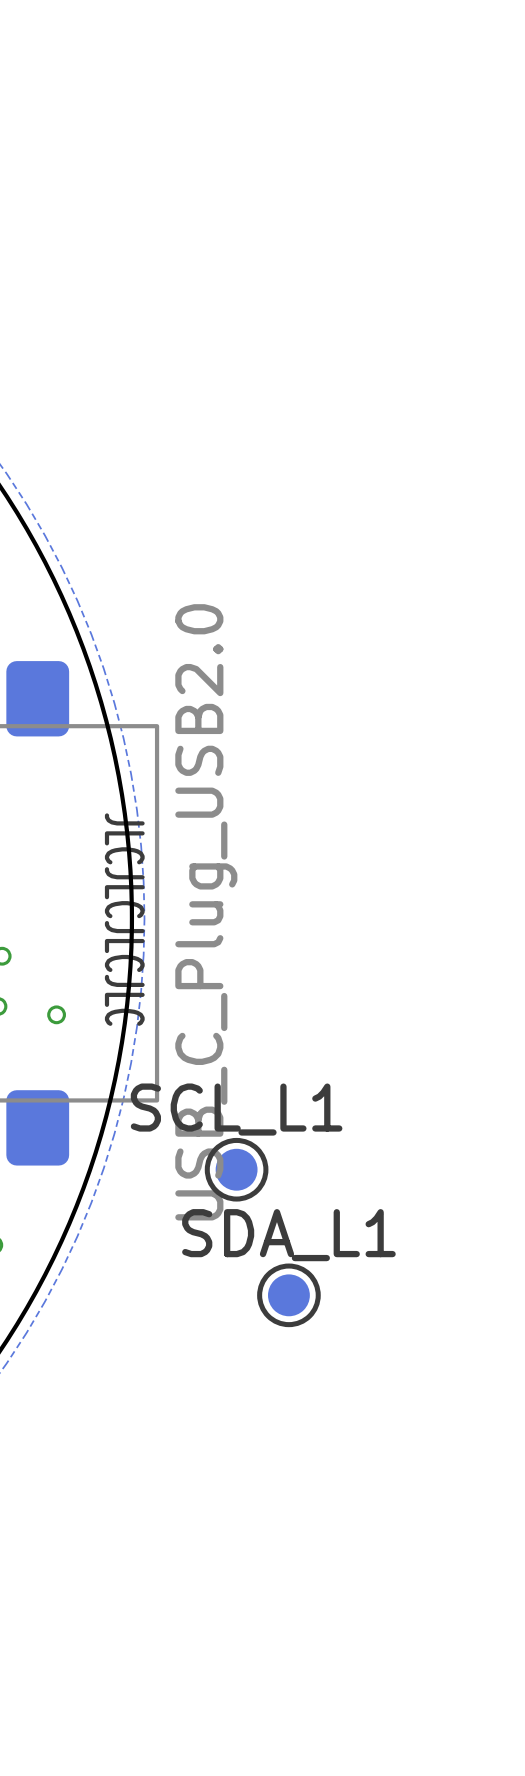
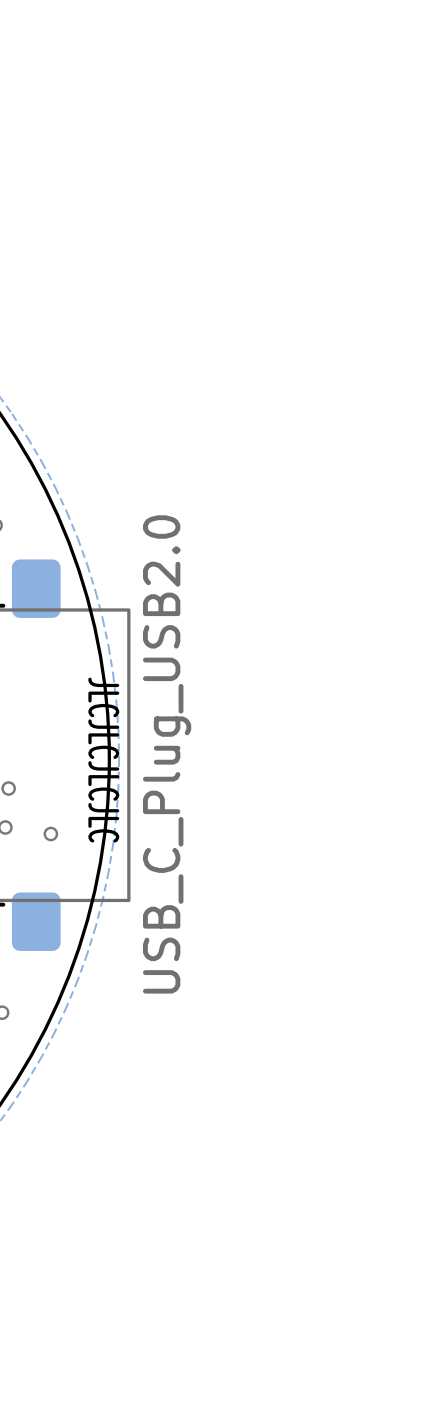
SCL_L1: (236, 1169) -> none
SDA_L1: (288, 1295) -> none

